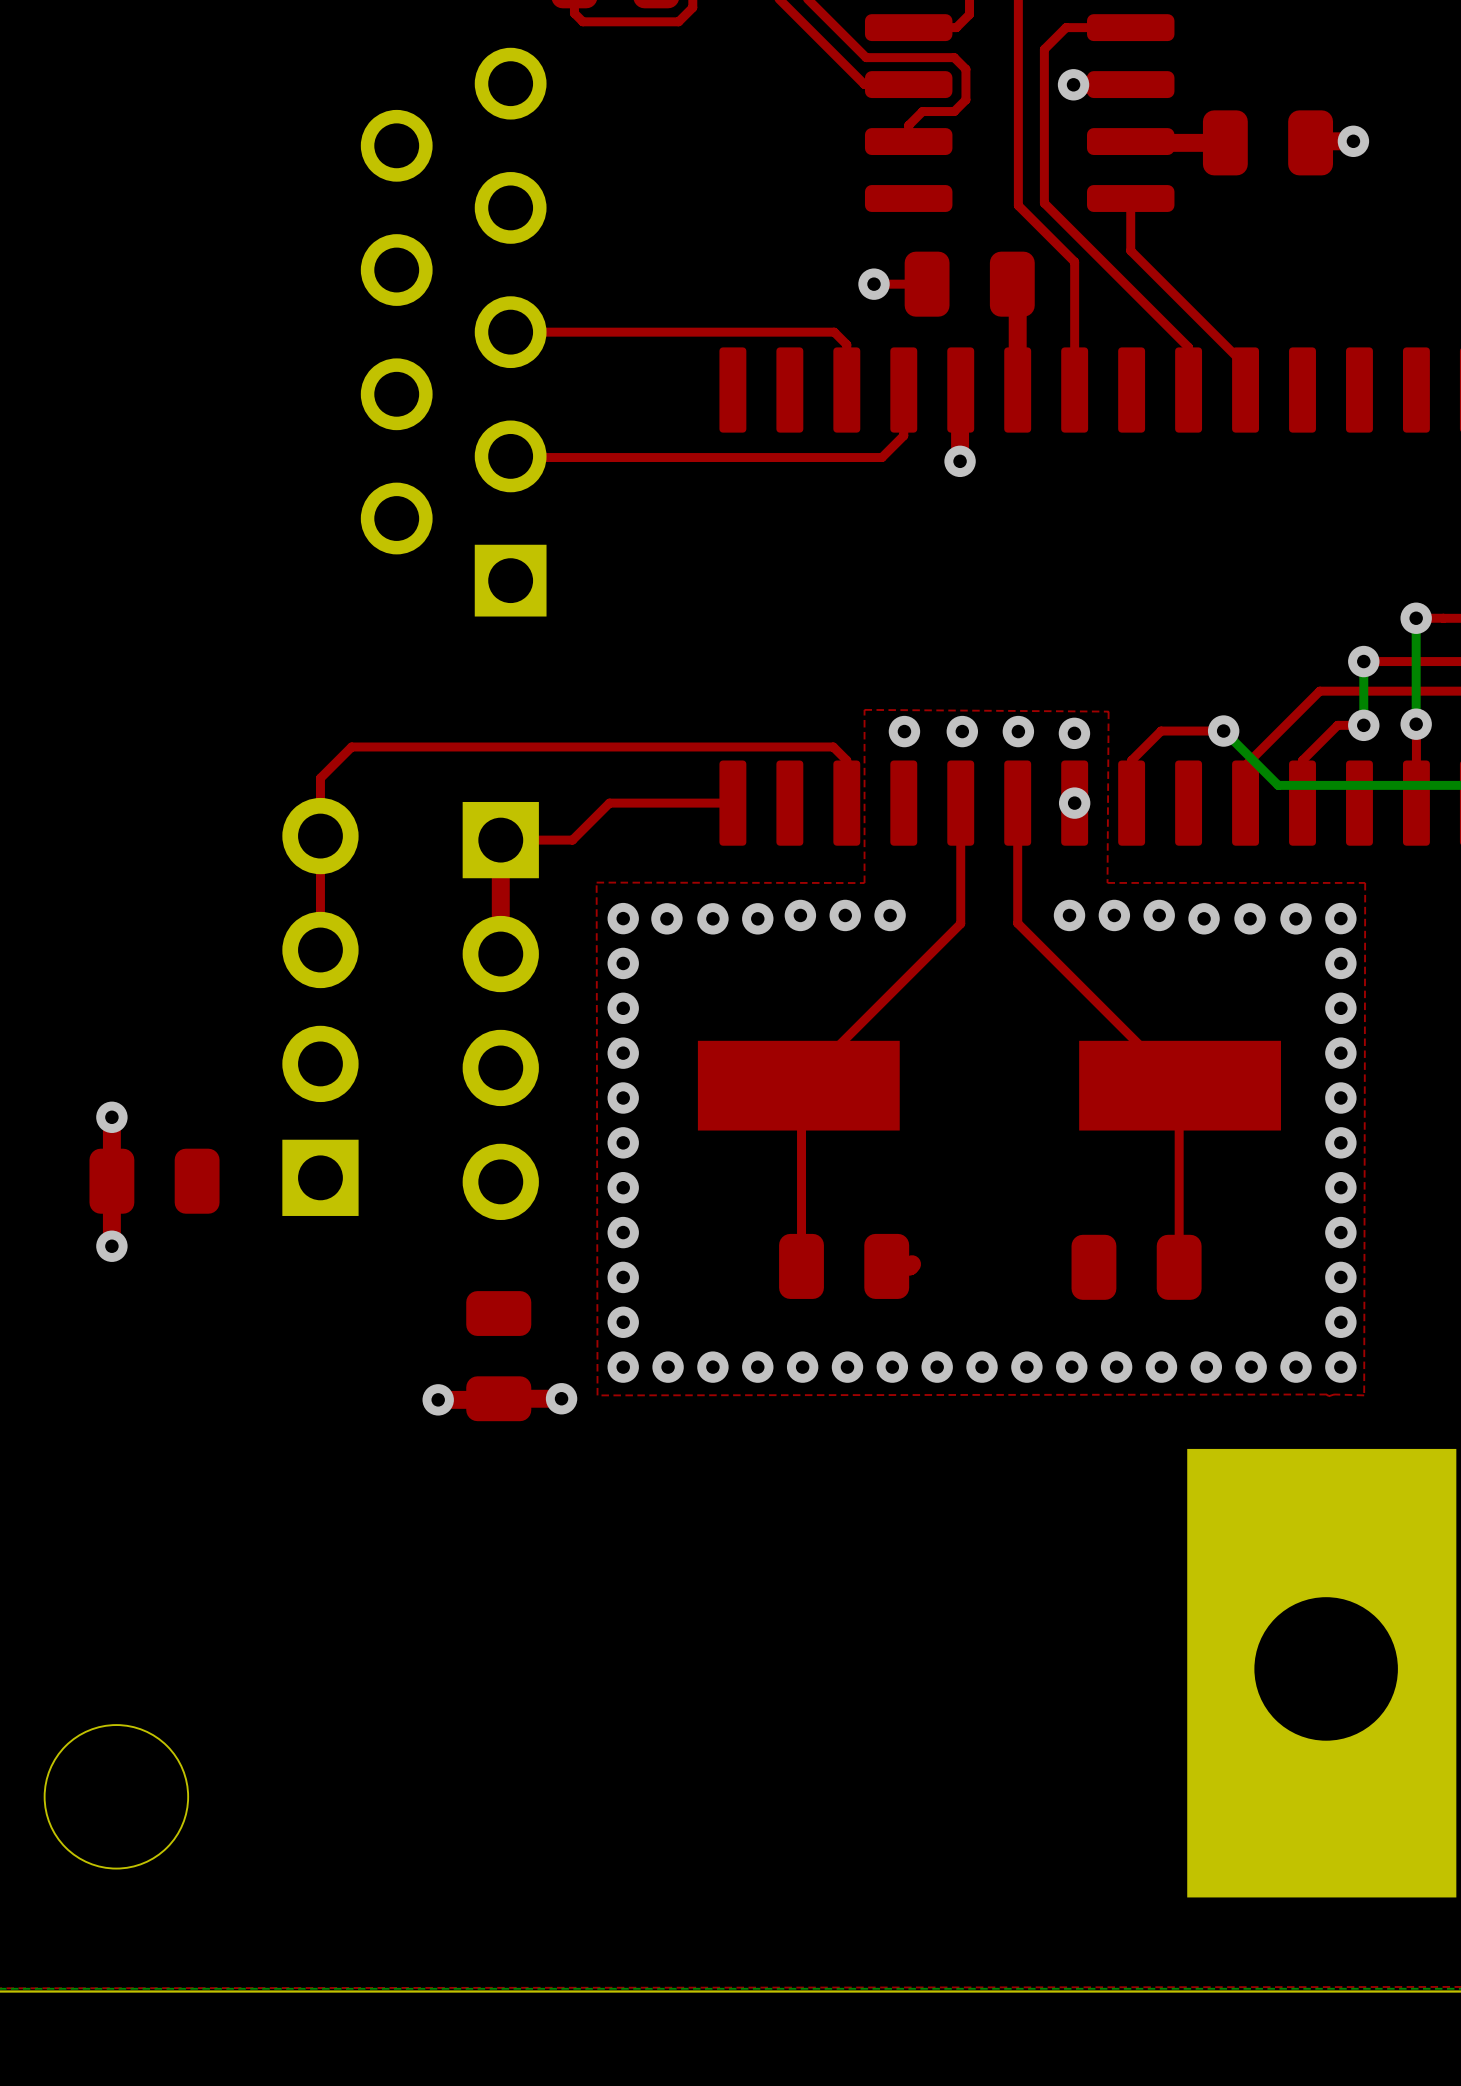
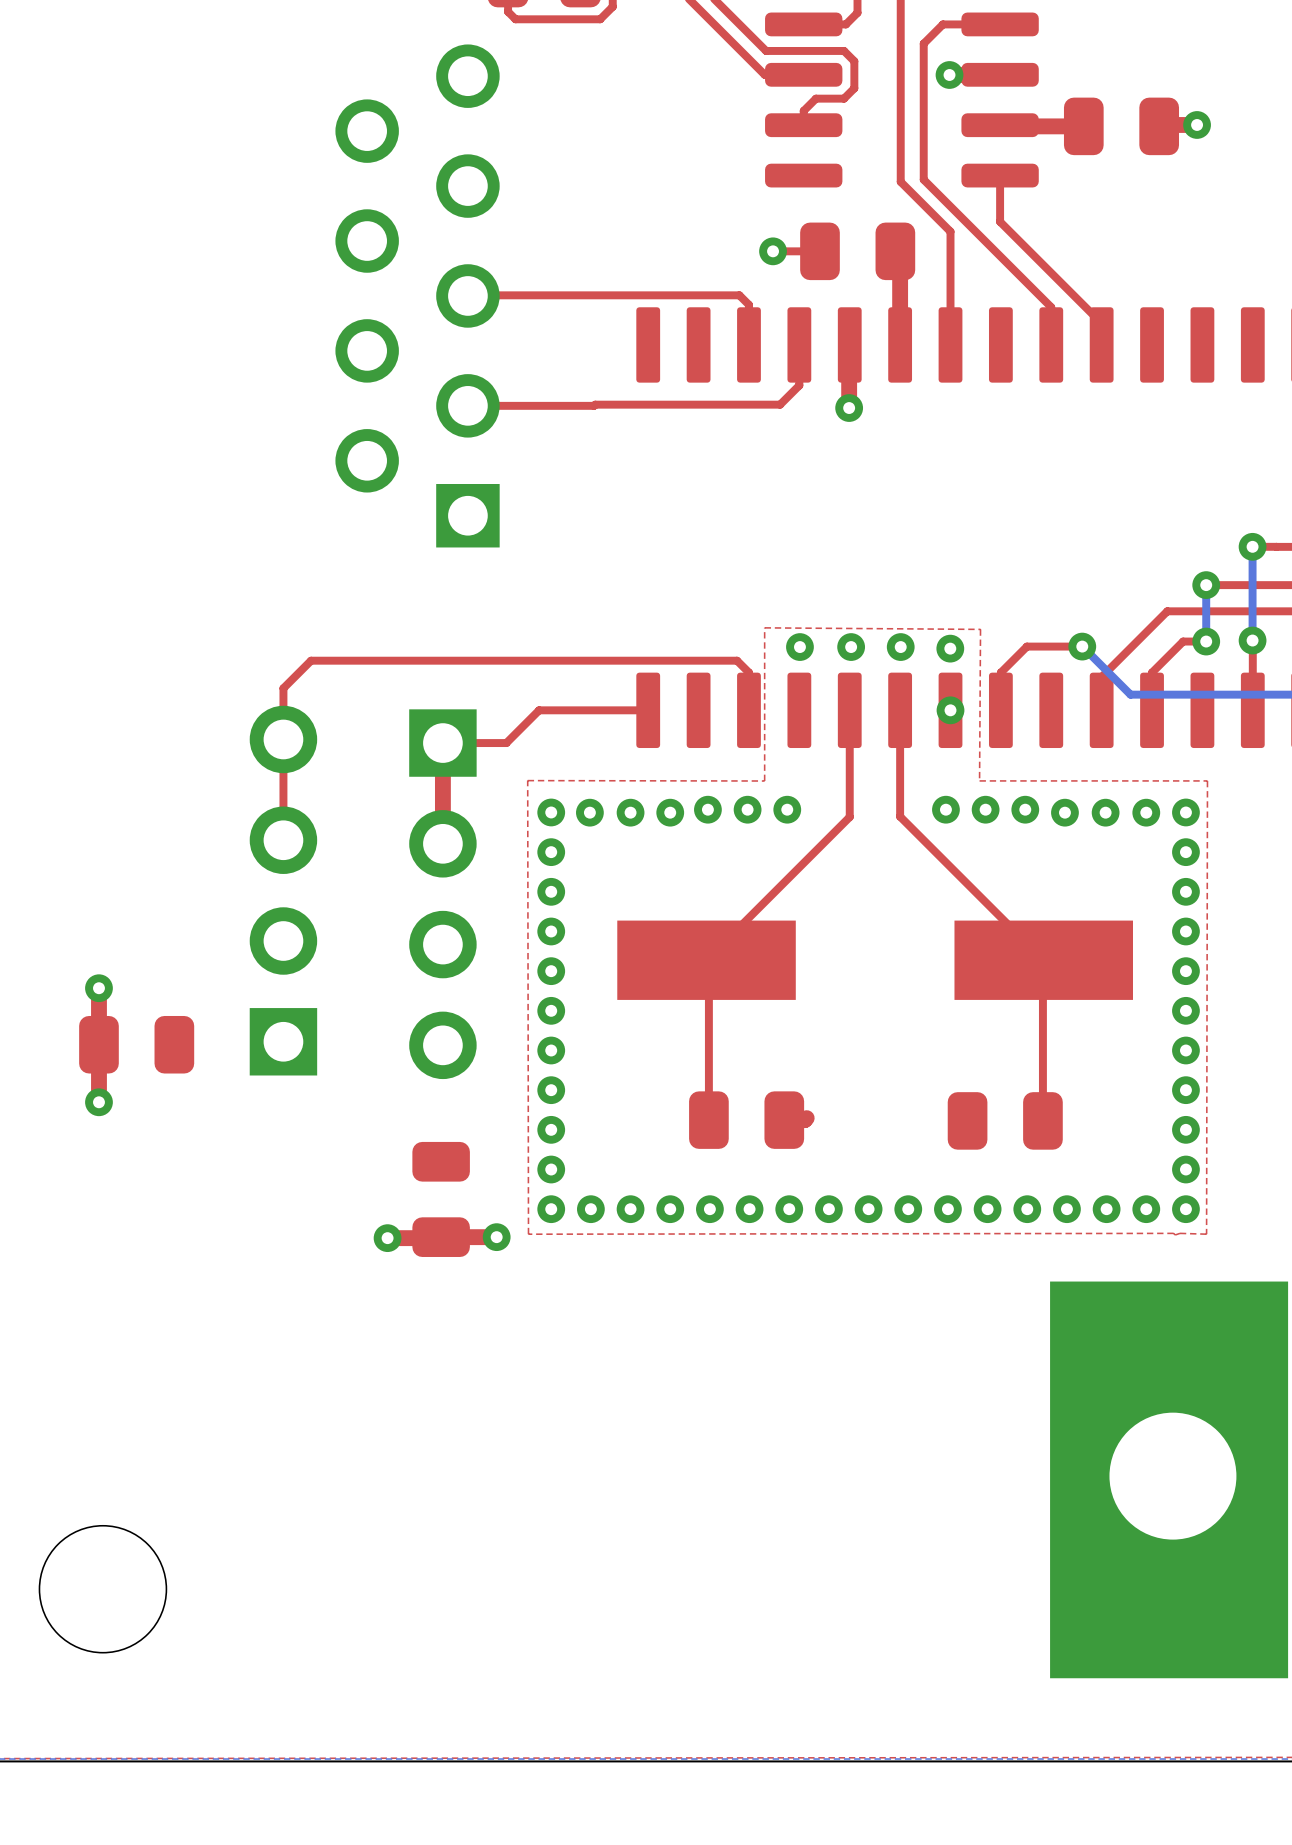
part position: (453, 332) -> (417, 295)
top track: (510, 332) (834, 332) (836, 333) -> (468, 295) (739, 295)
top track: (510, 456) (673, 457) -> (467, 405) (595, 404)

